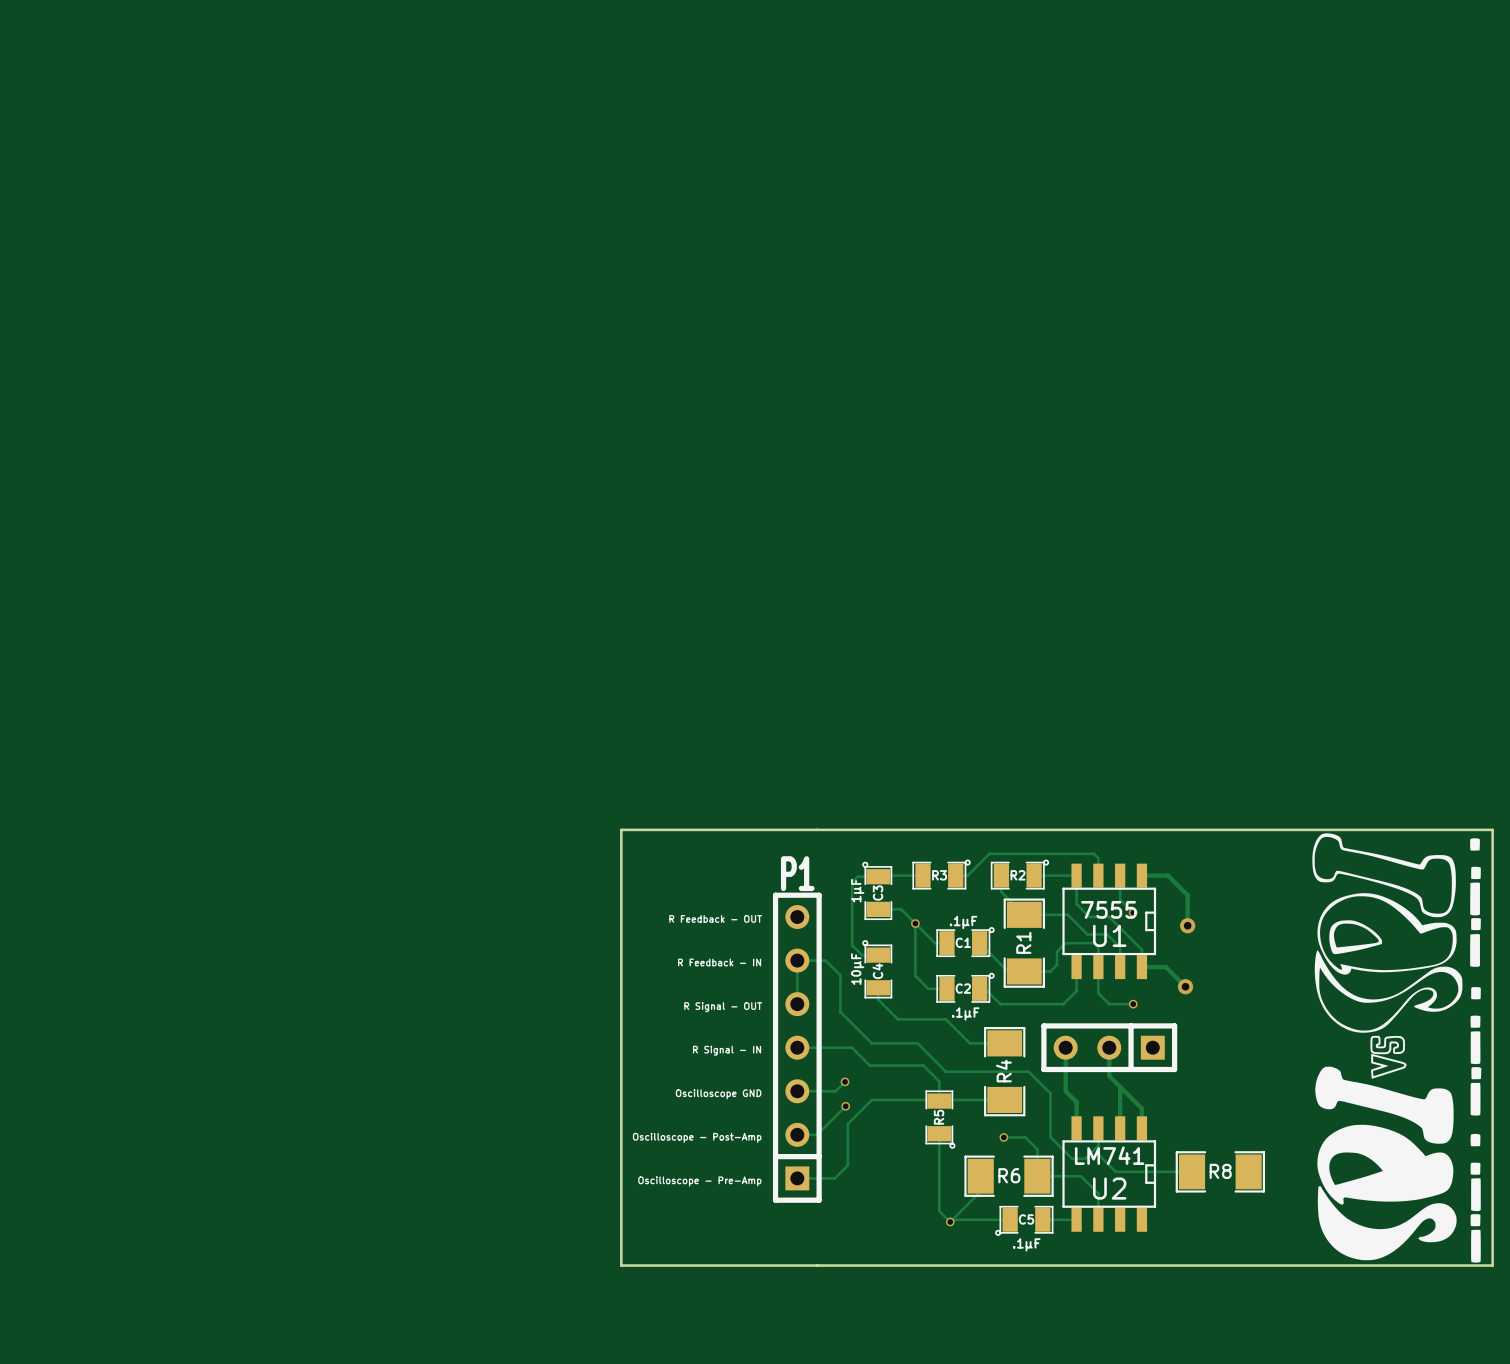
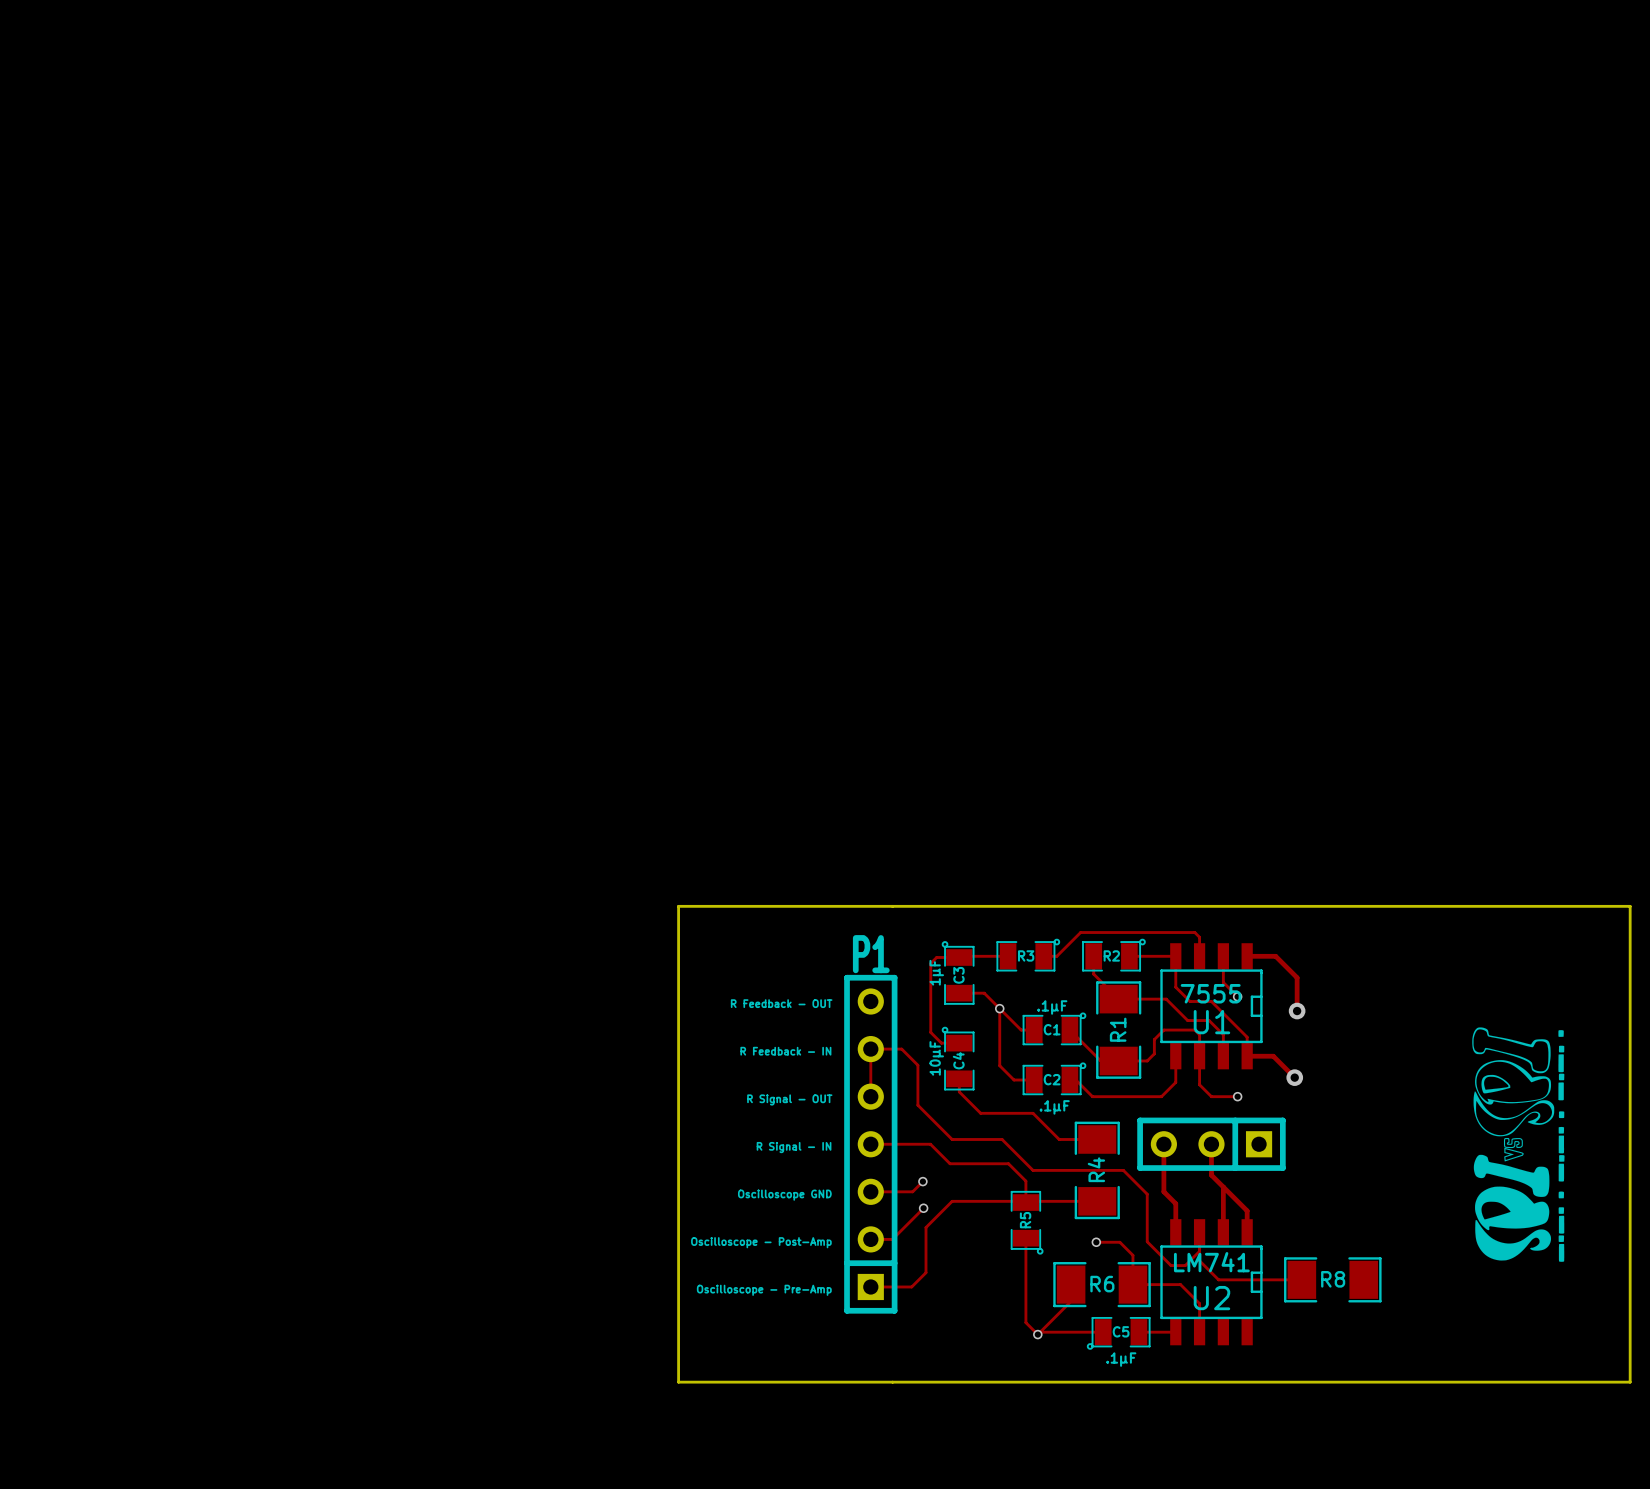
drawing shape: [1312, 833, 1482, 1263] -> [1472, 1027, 1565, 1262]

